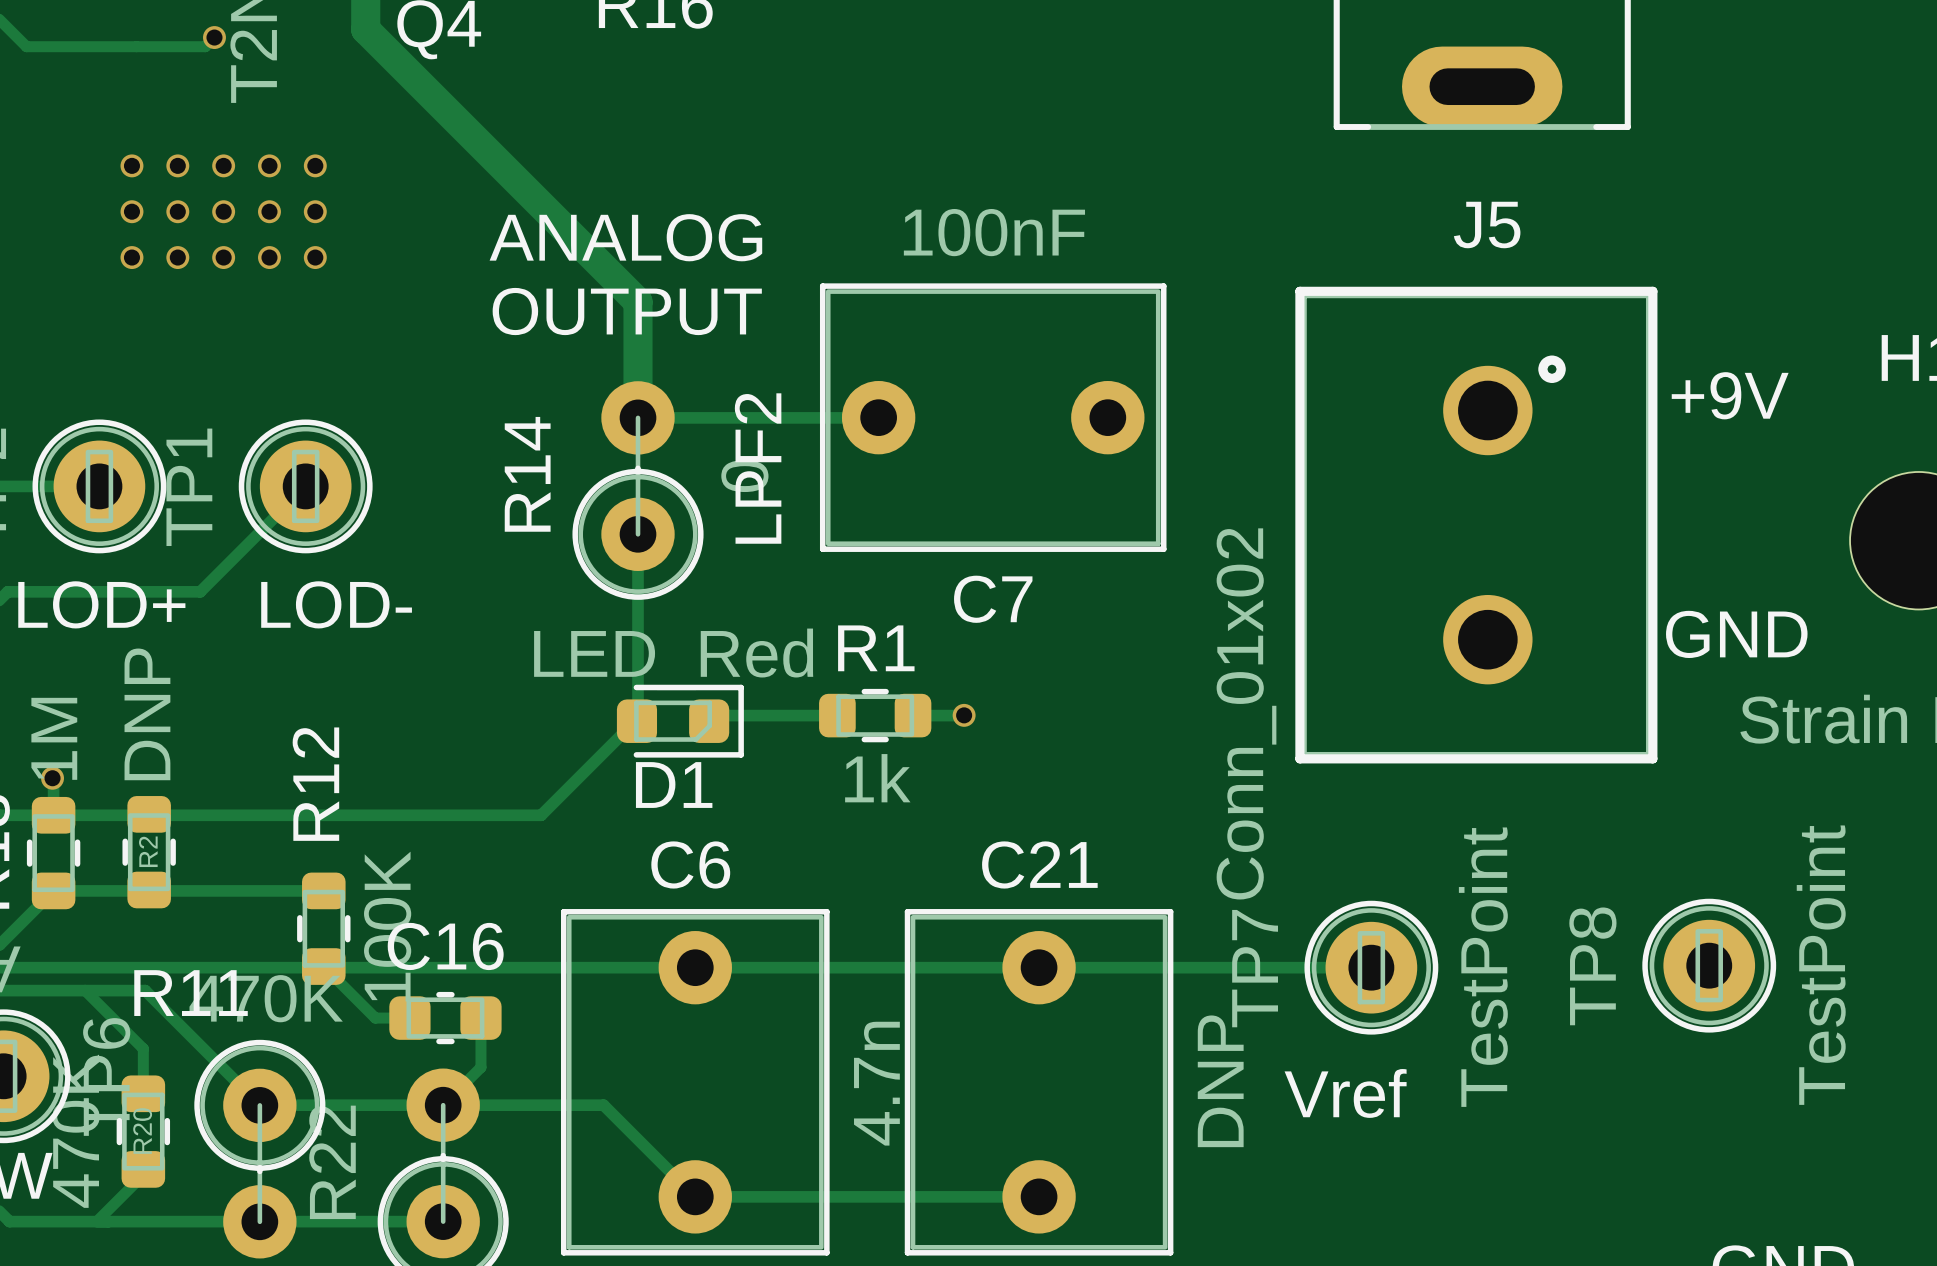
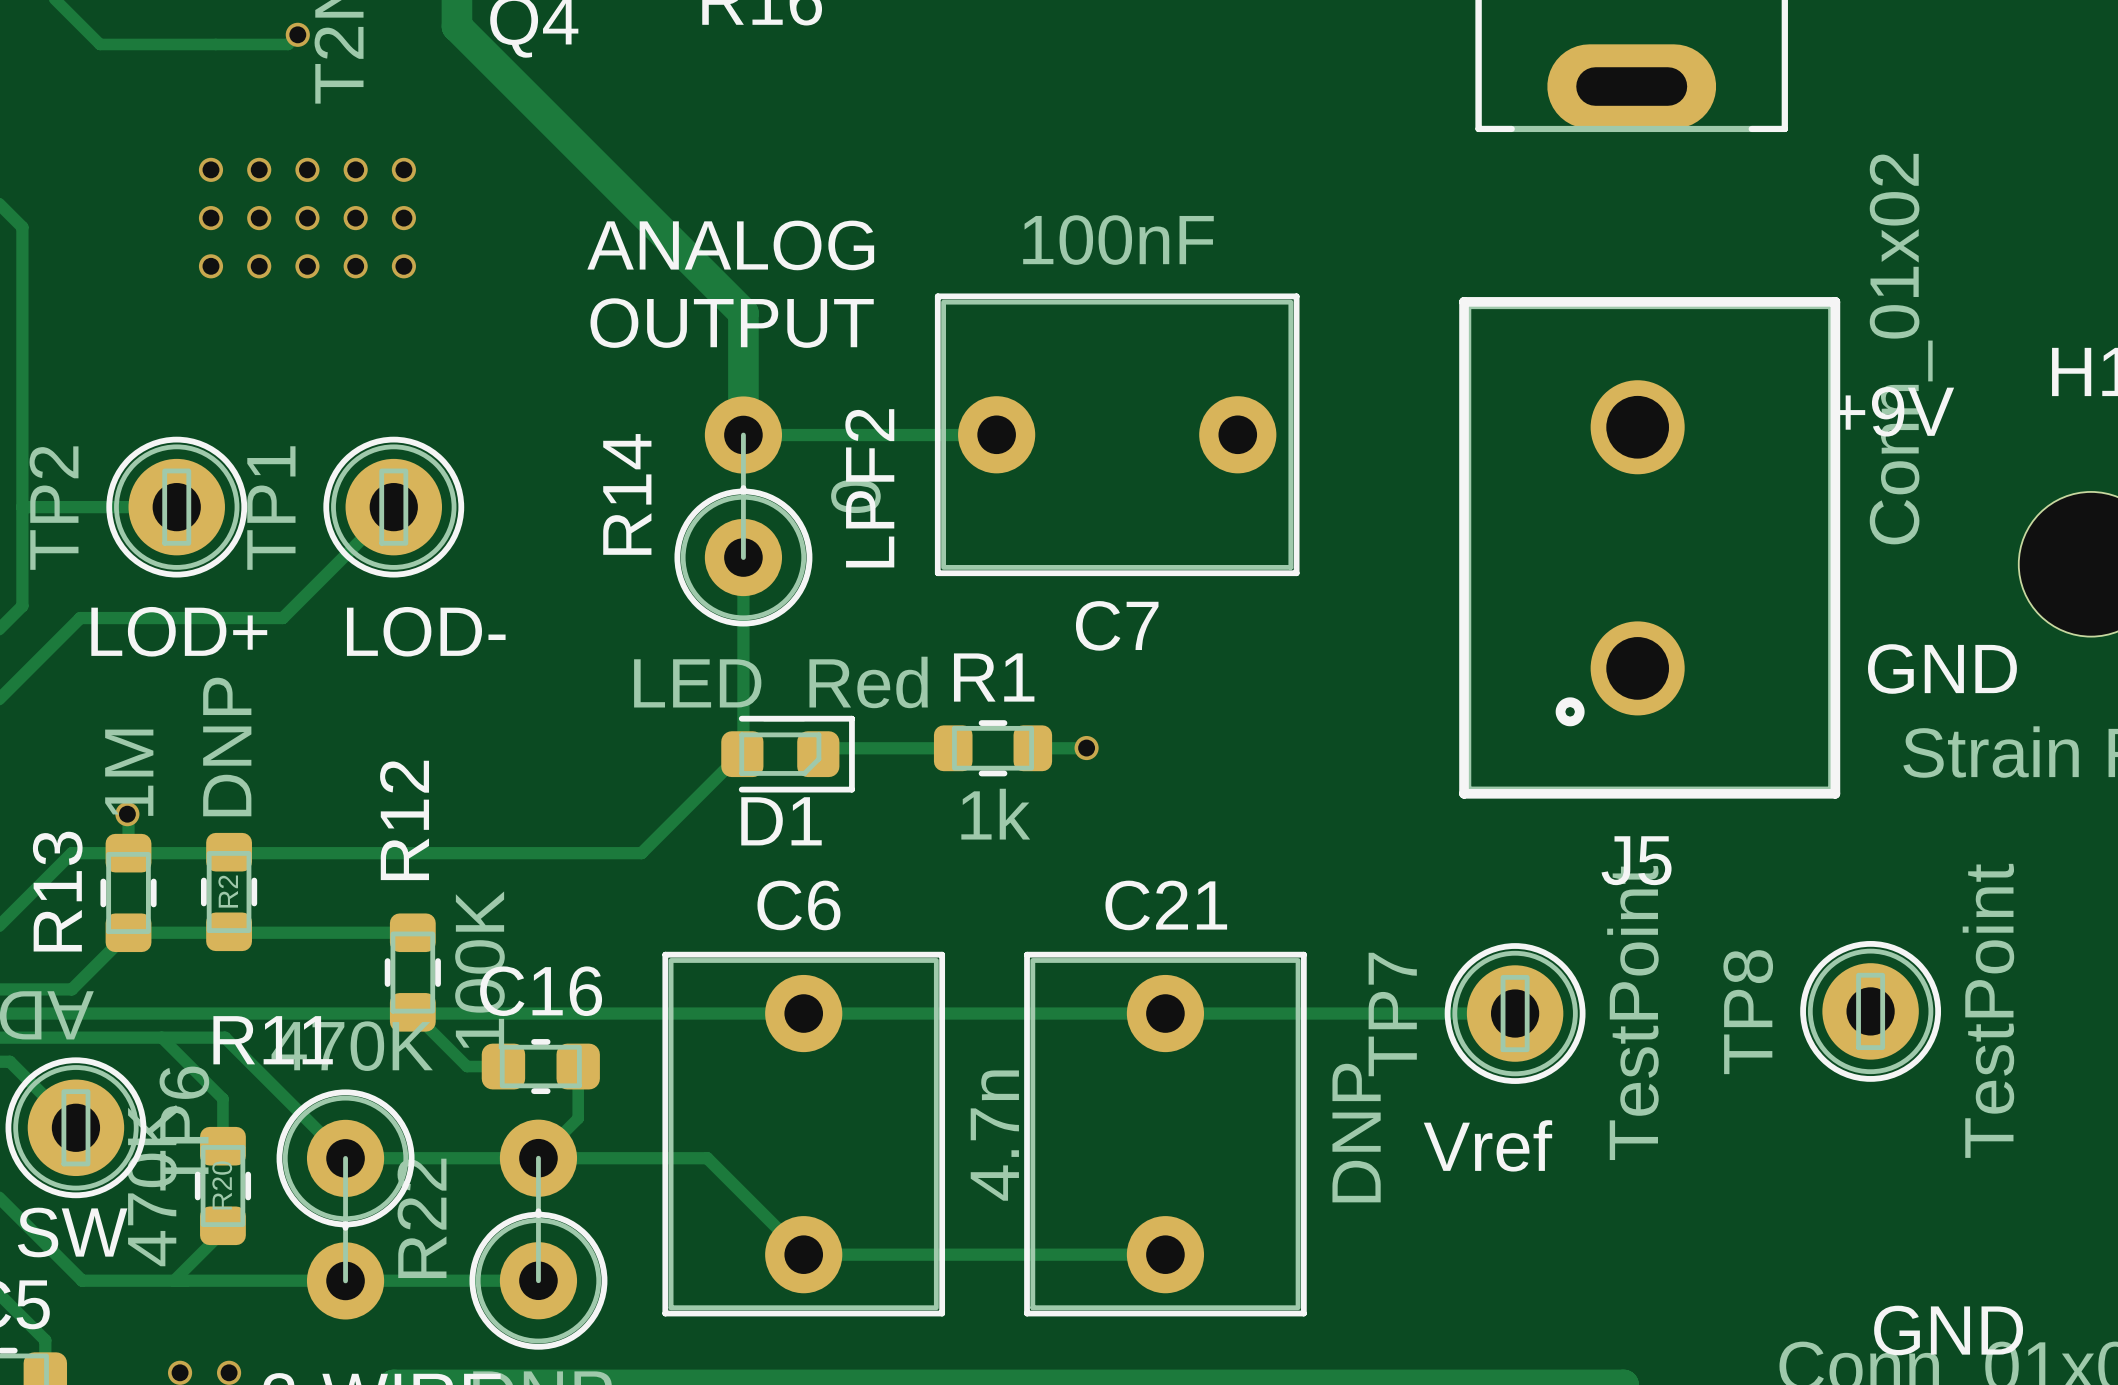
J5 rotation: 0° (1476, 525) -> 180° (1649, 547)
text position: GND (1736, 634) -> GND (1942, 668)

